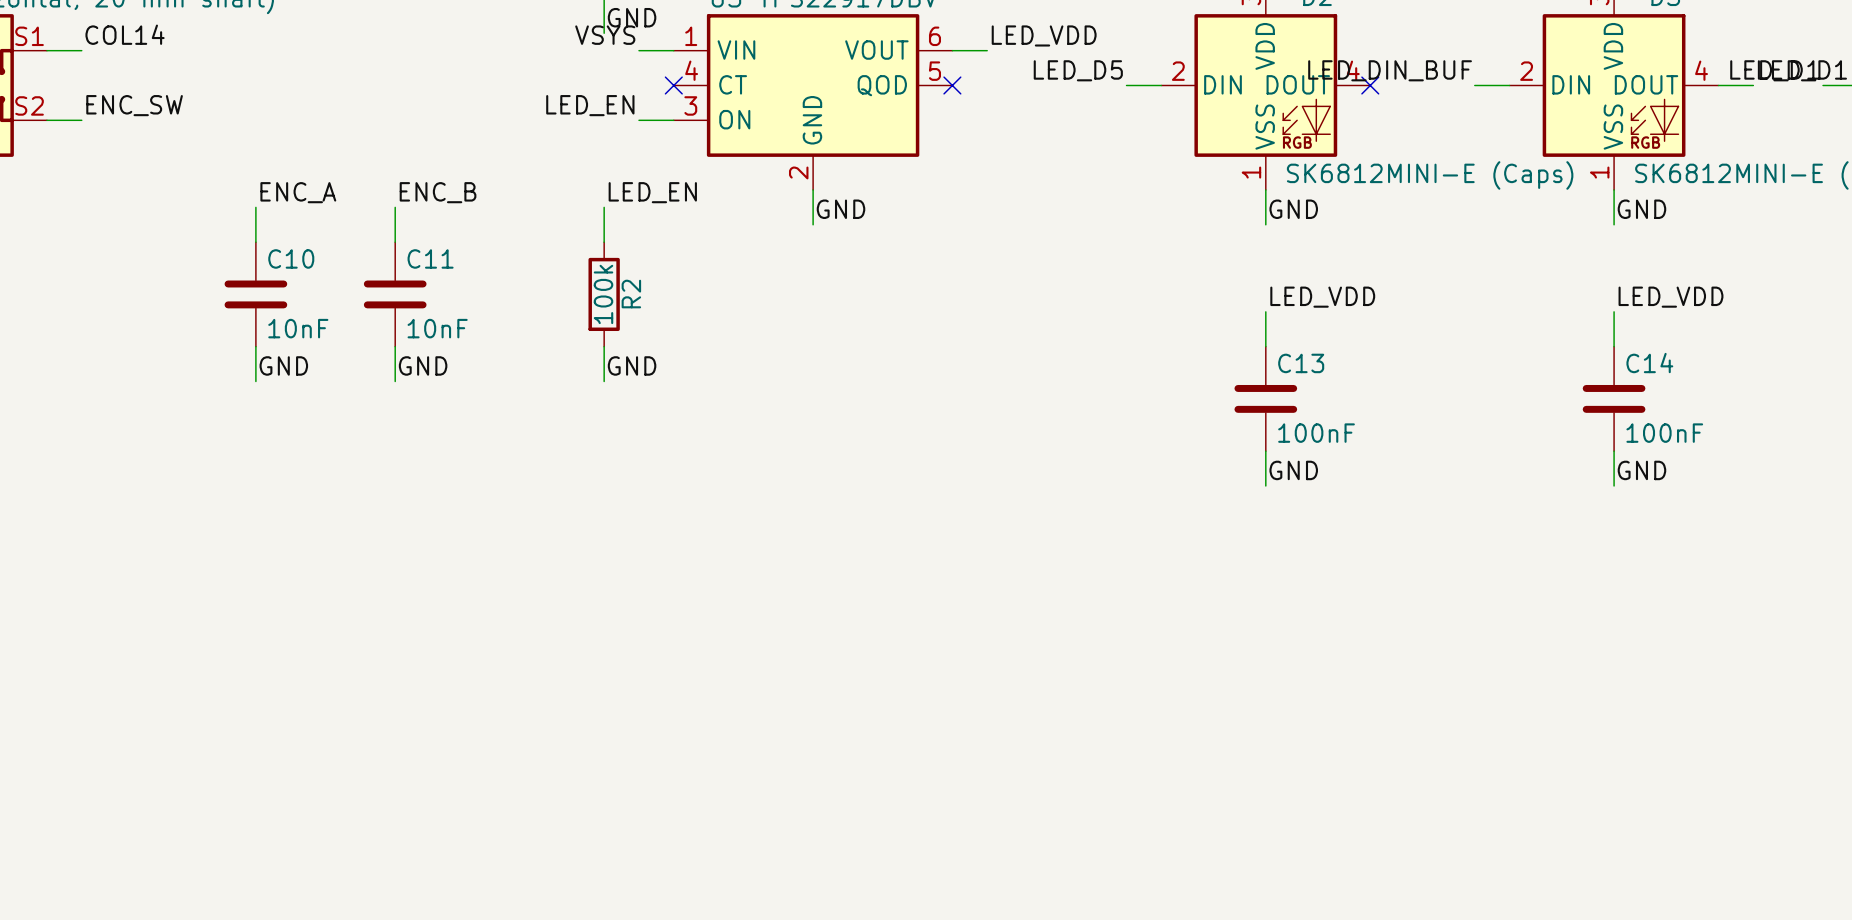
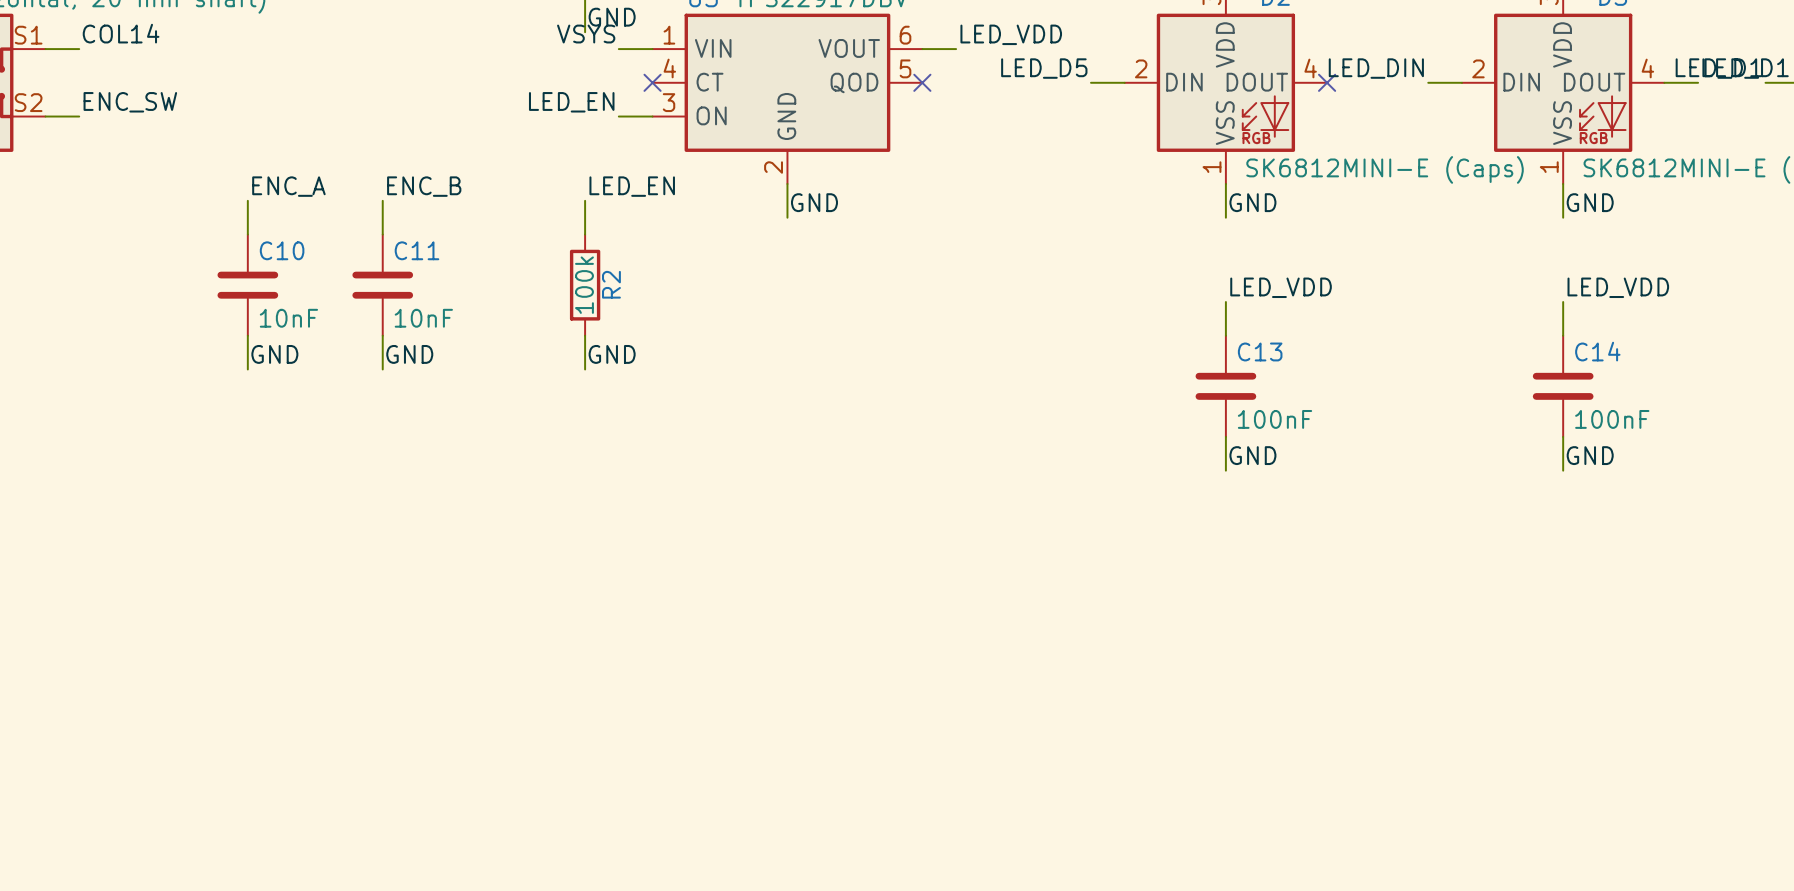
label: LED_DIN_BUF (1390, 70) -> LED_DIN (1376, 68)

